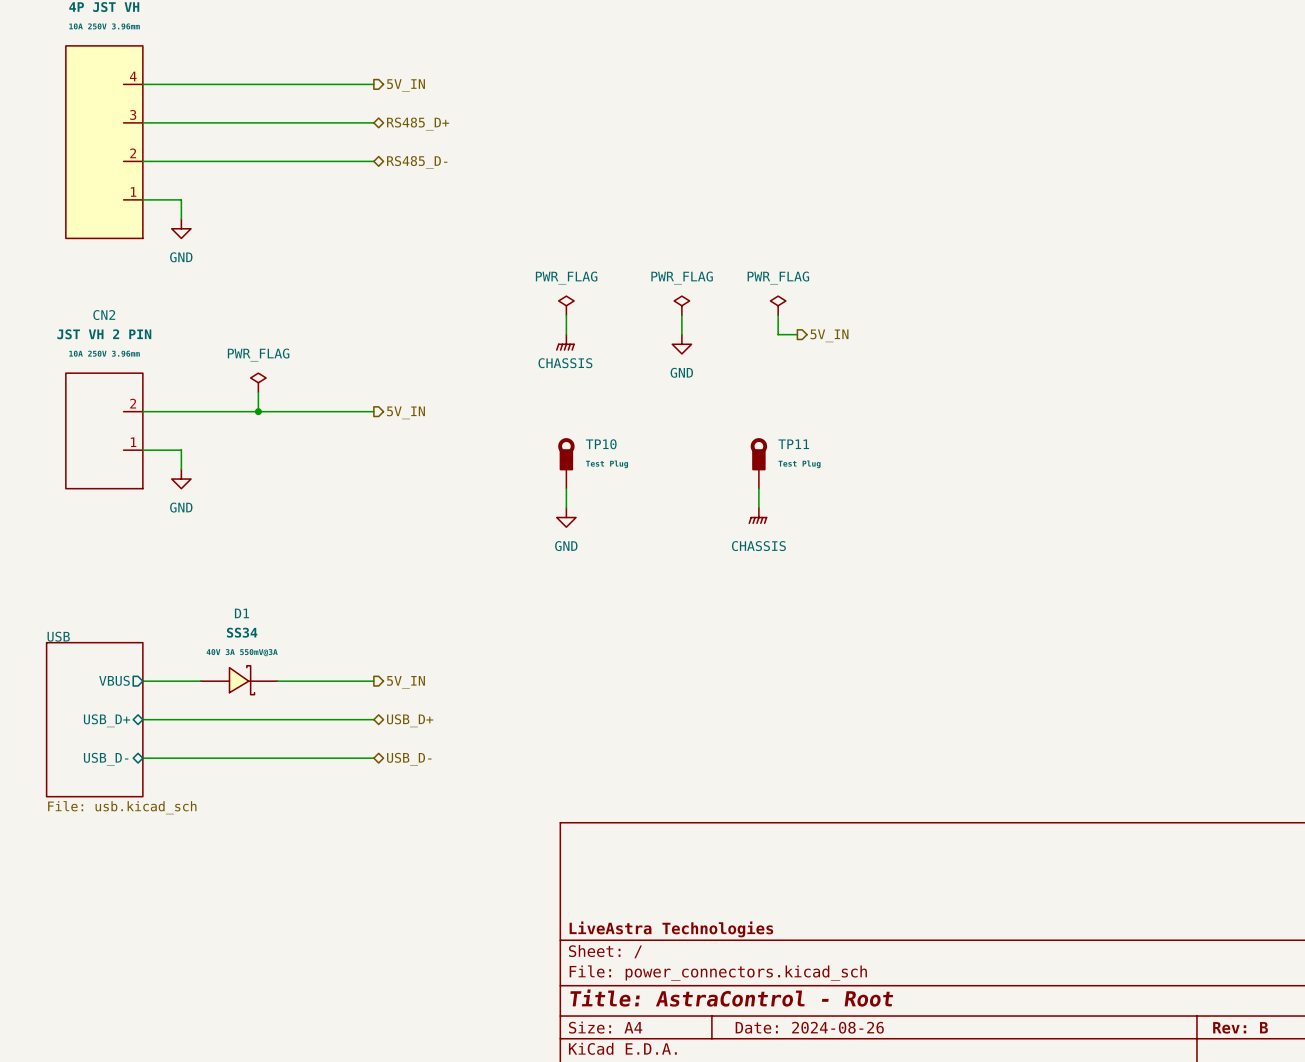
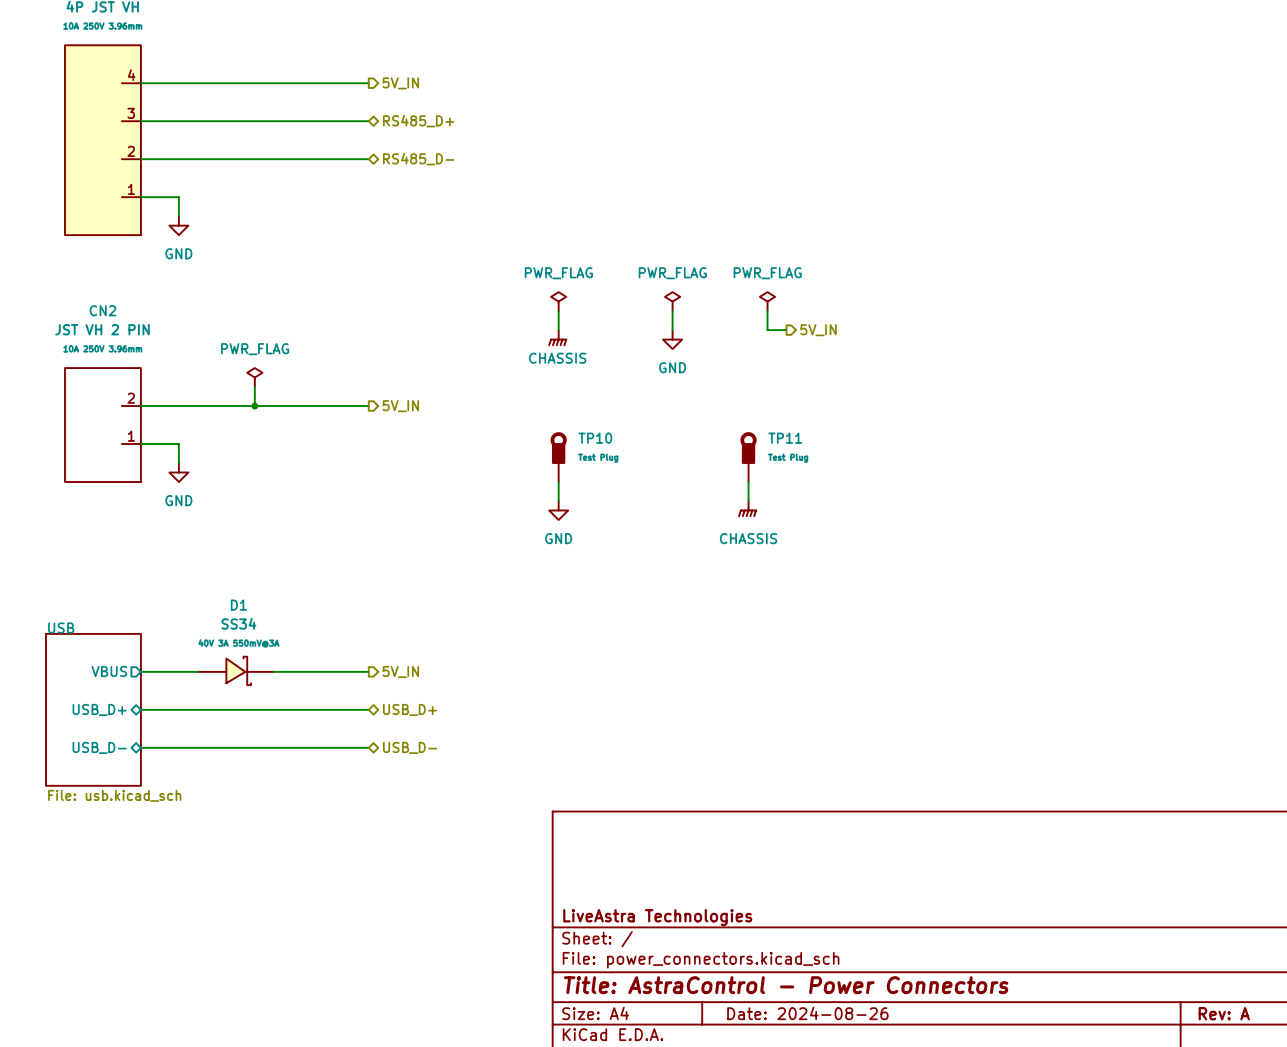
title block: Title: AstraControl - Root (731, 998) -> Title: AstraControl - Power Connectors (786, 985)
title block: Rev: B (1240, 1027) -> Rev: A (1224, 1013)

